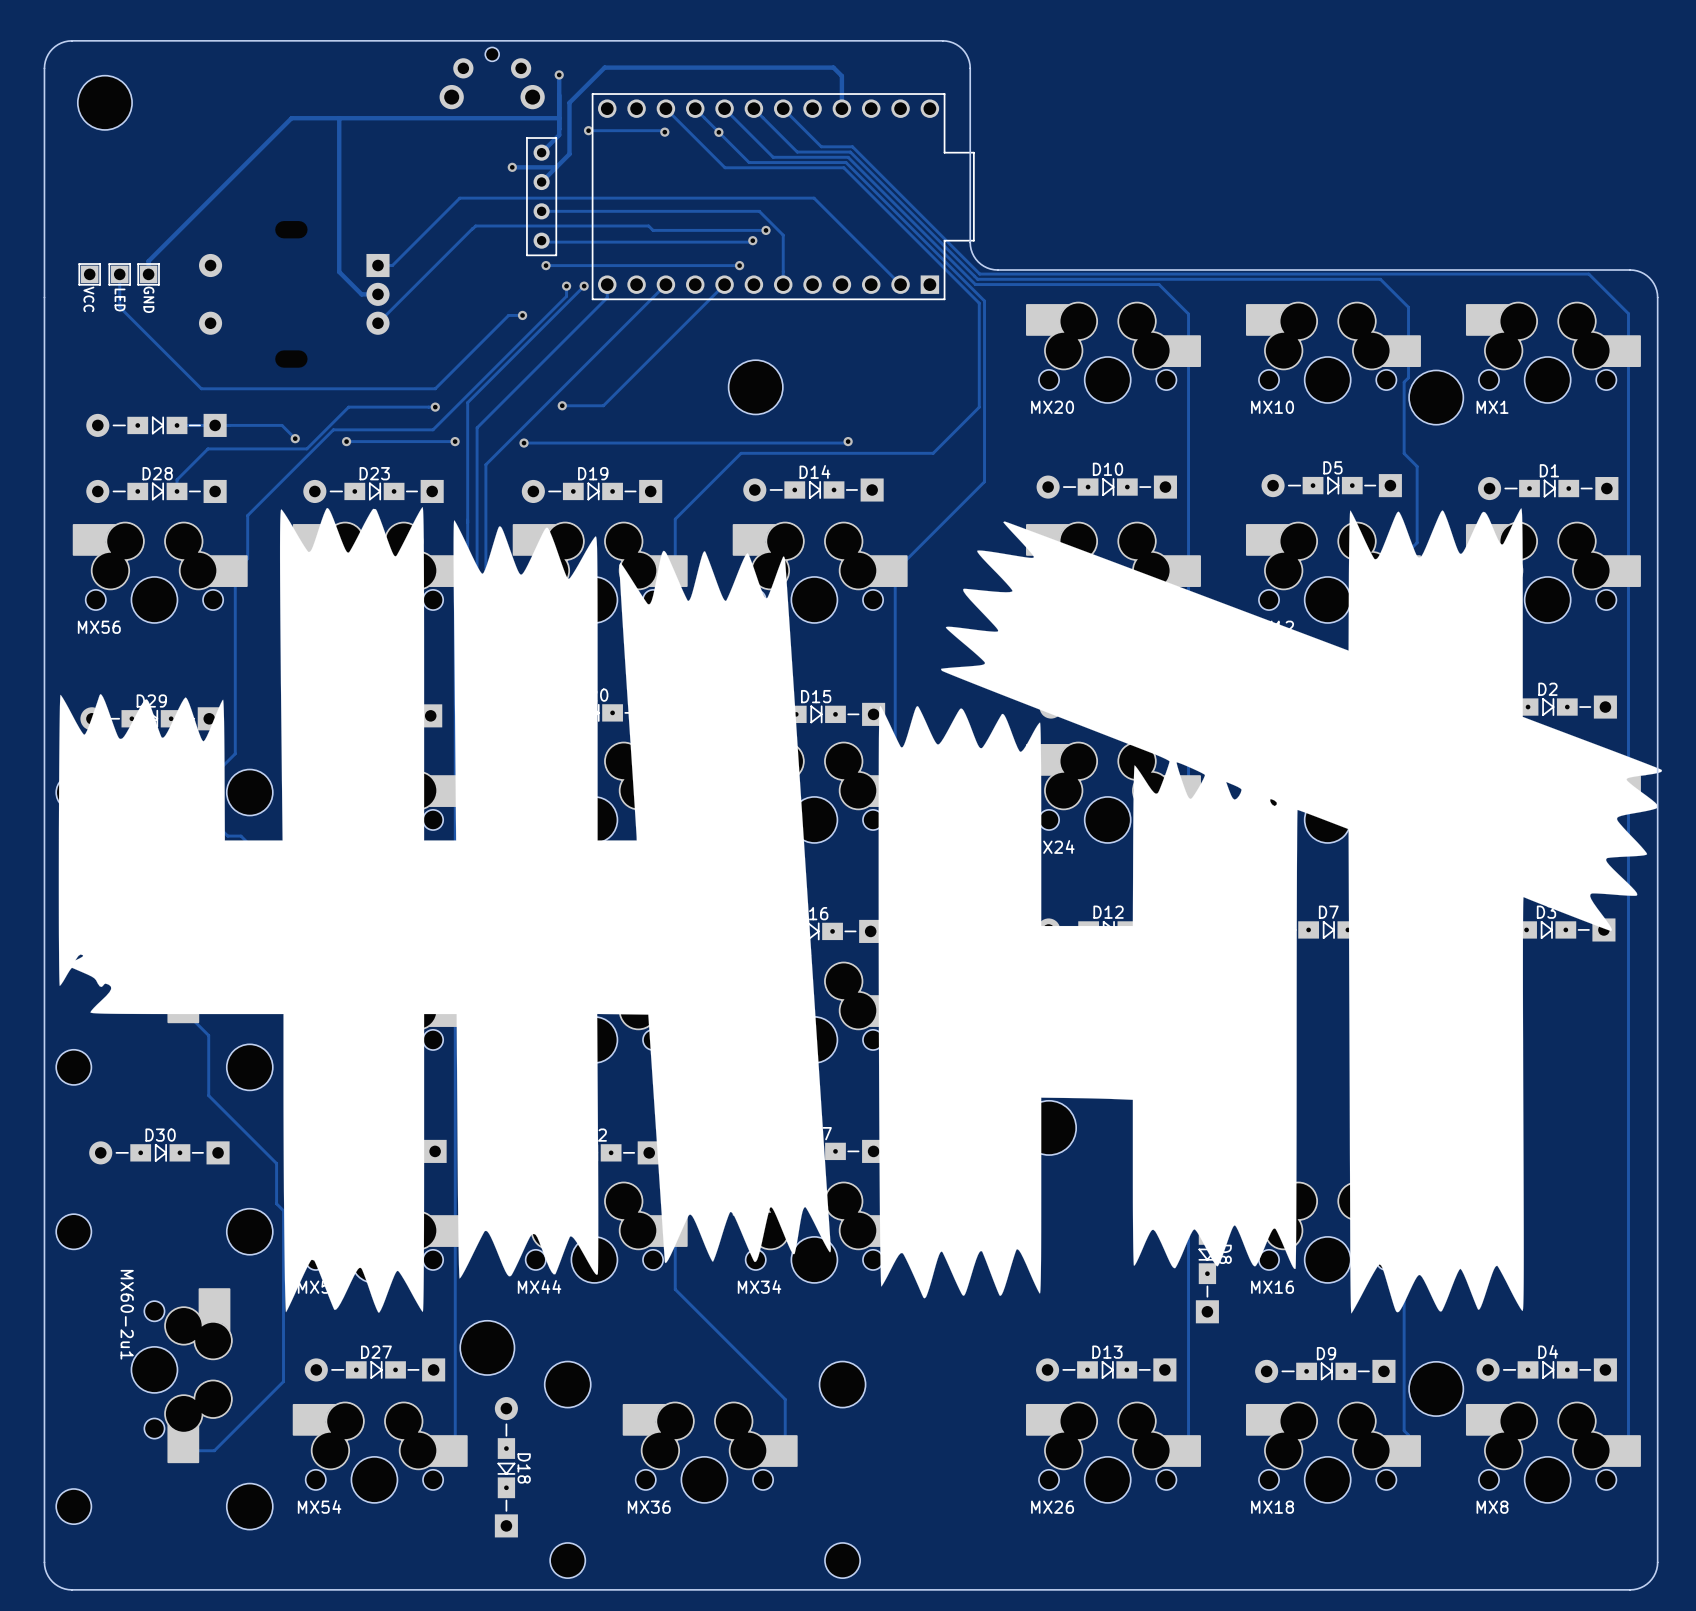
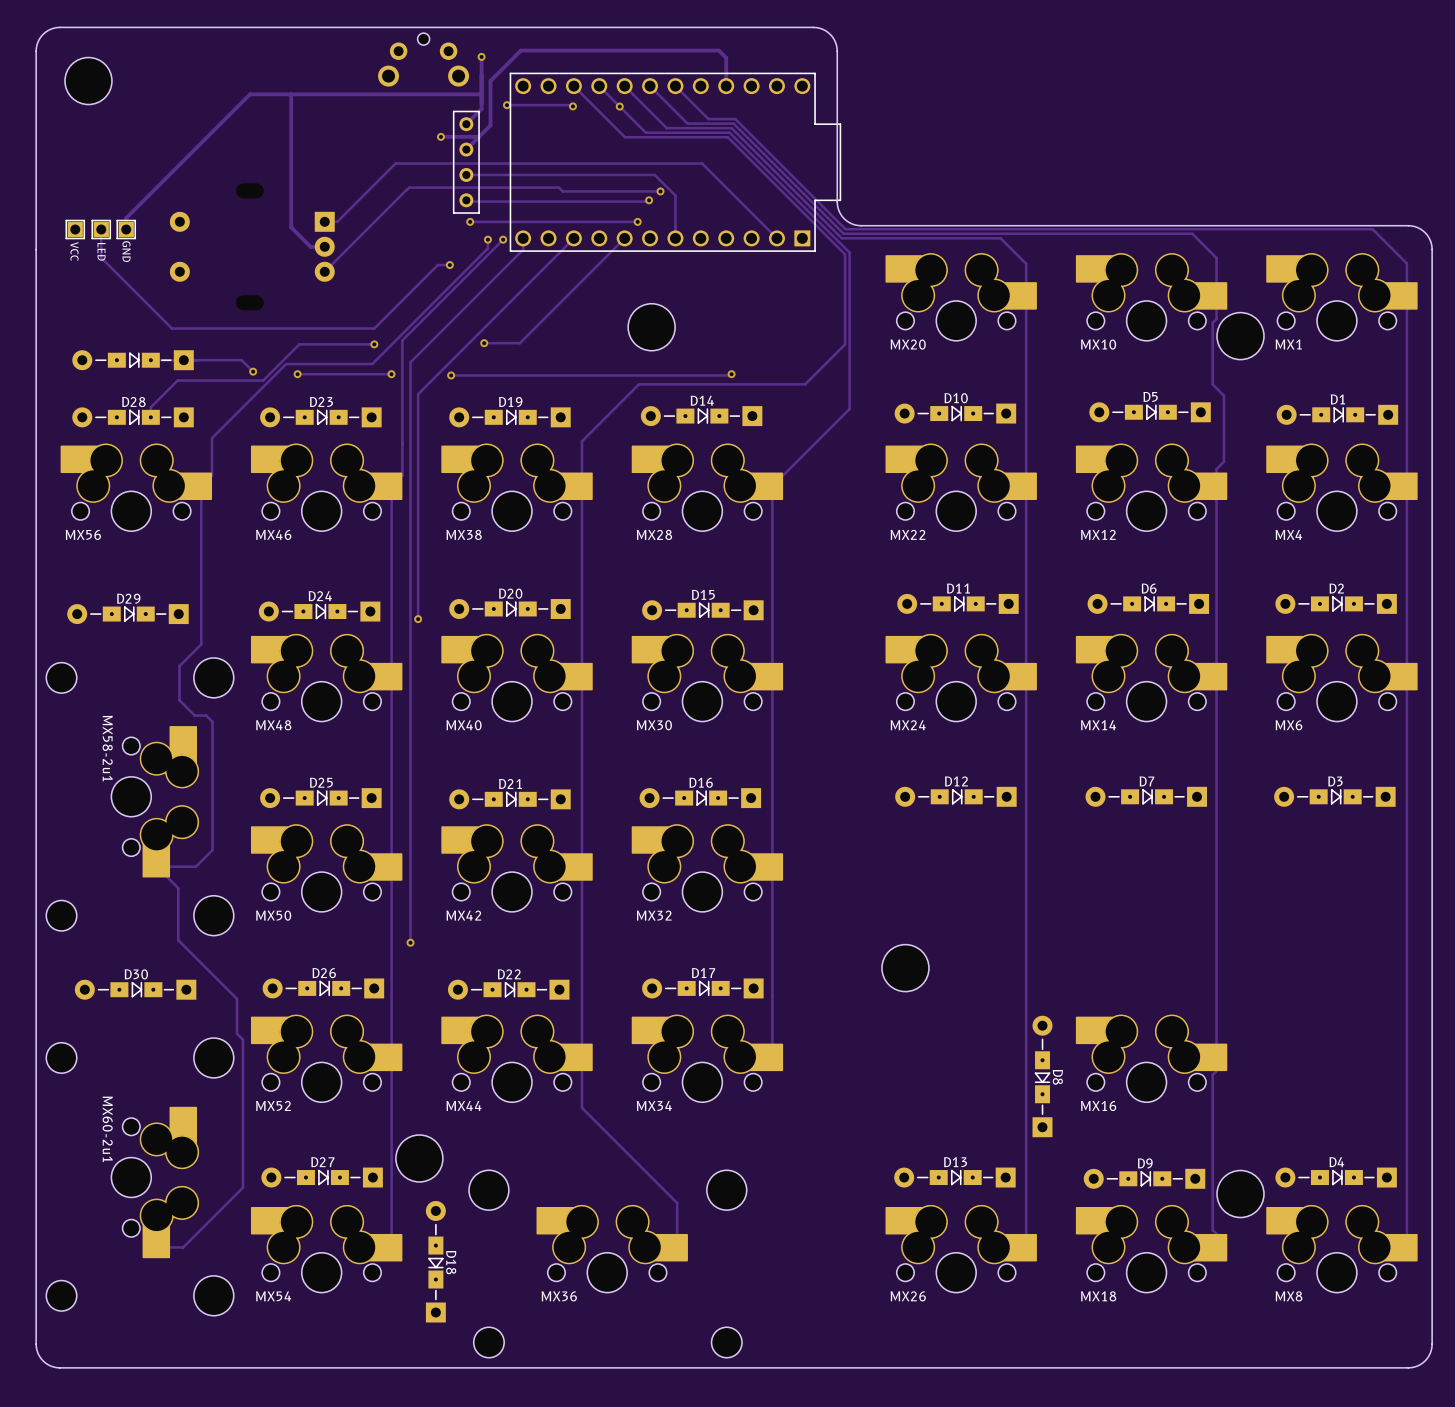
drawing: [58, 507, 1663, 1314] -> none

